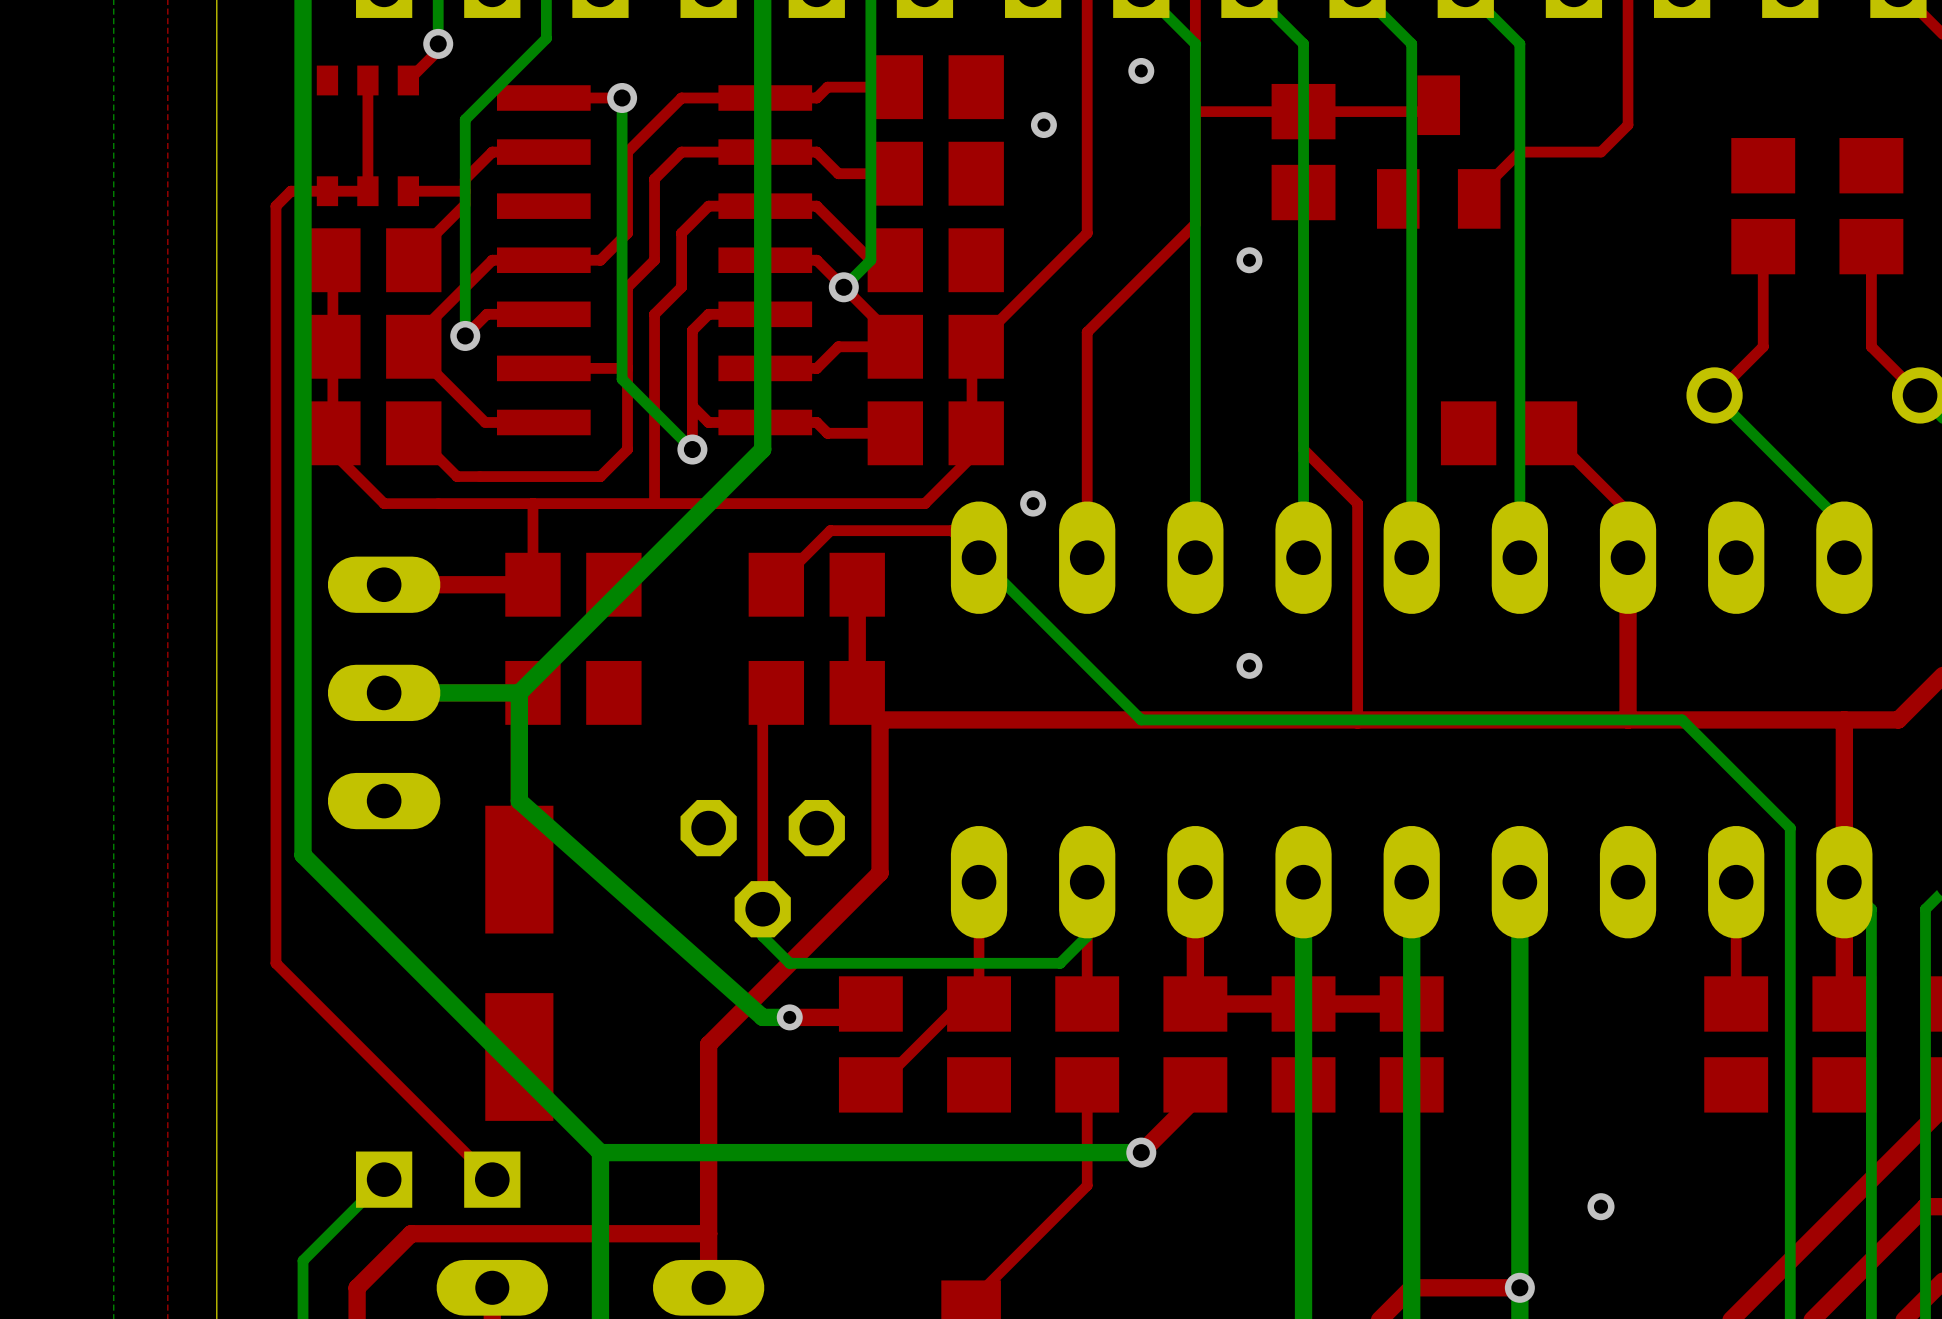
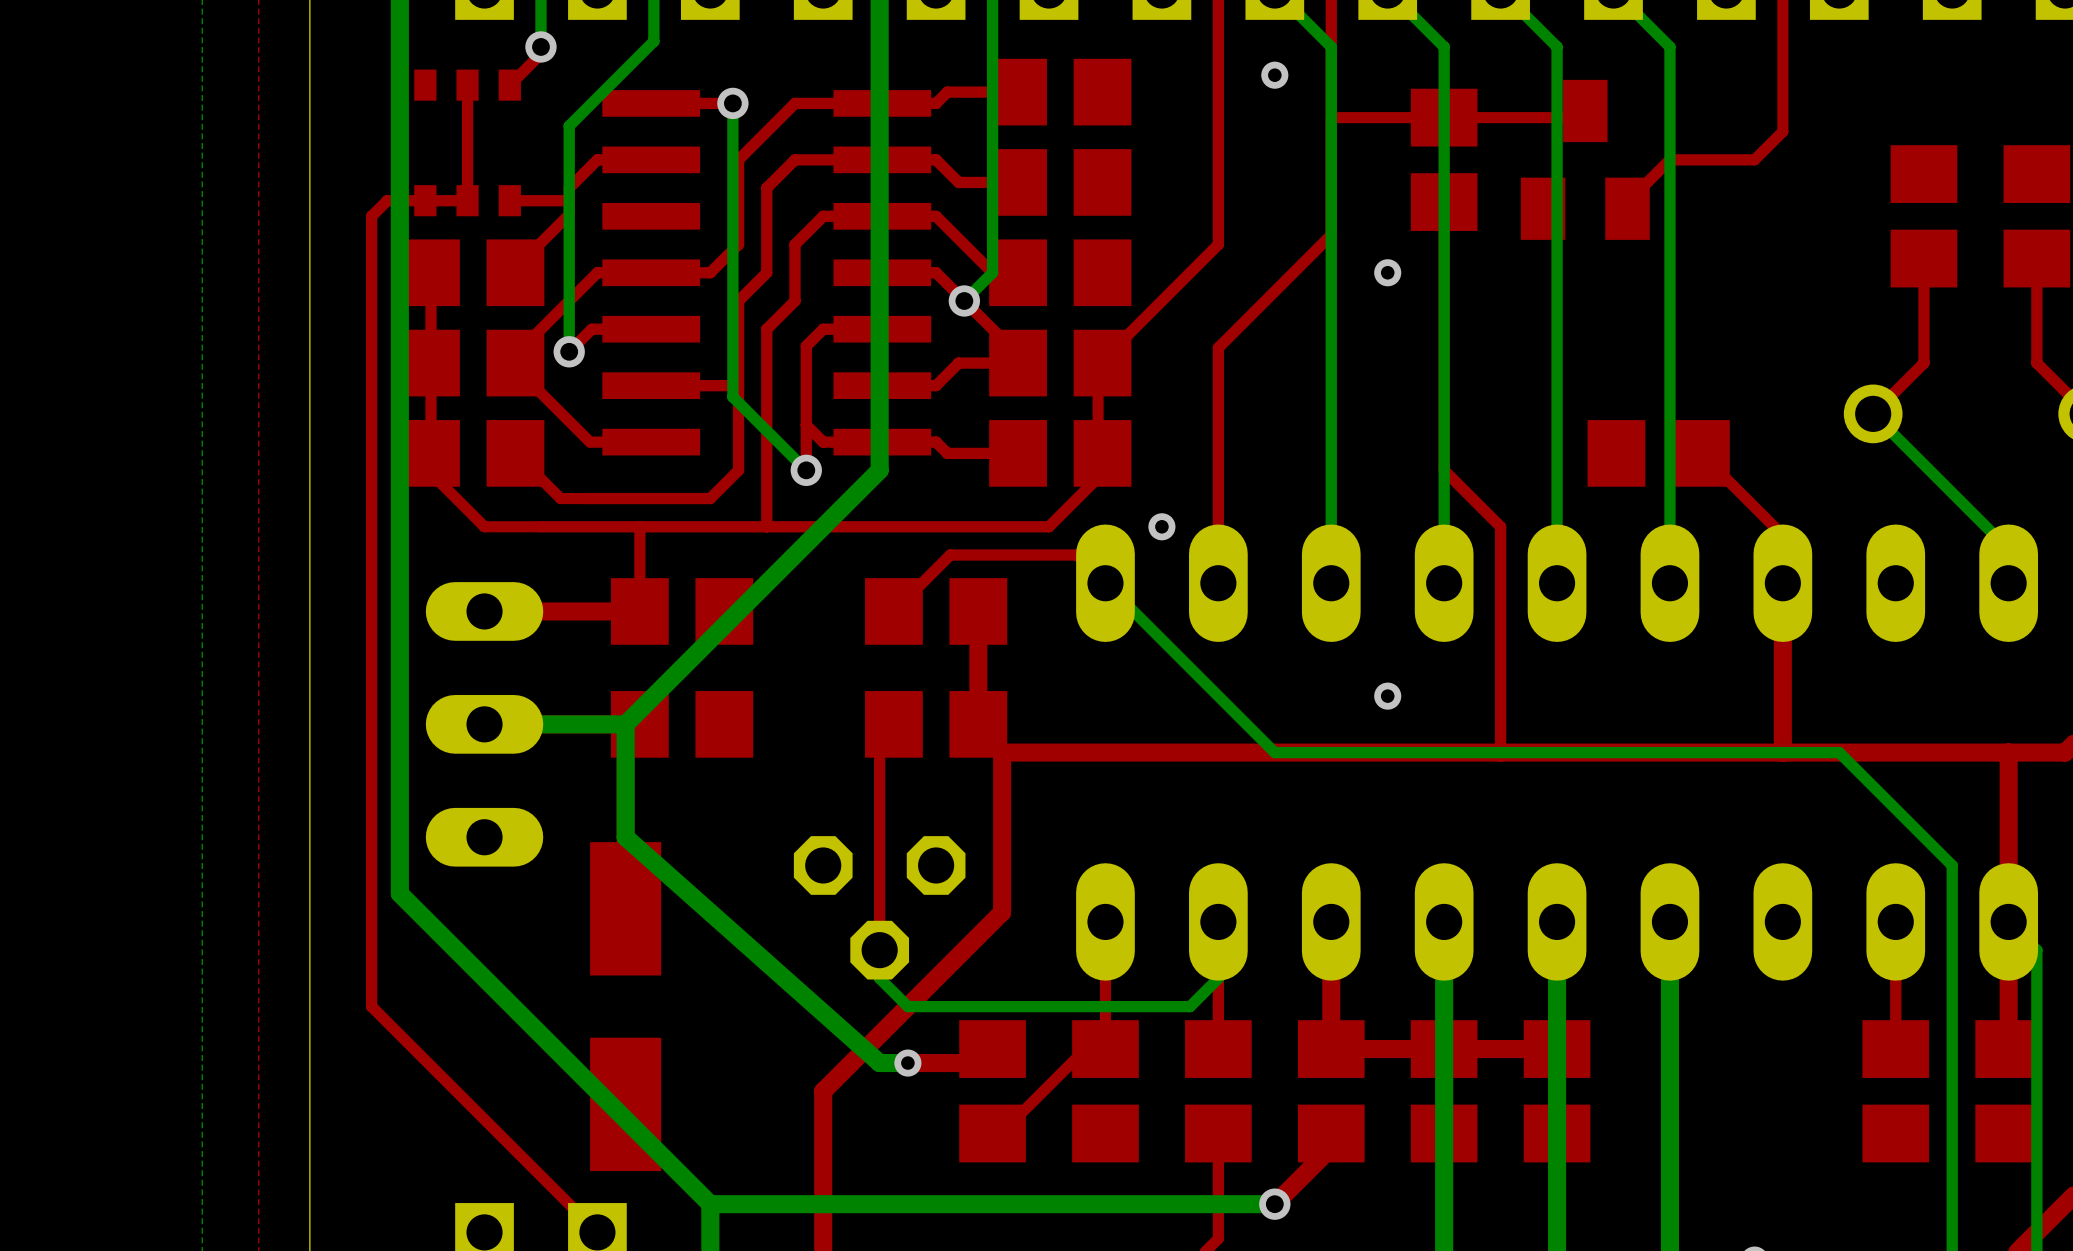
via: (1043, 125) -> none

